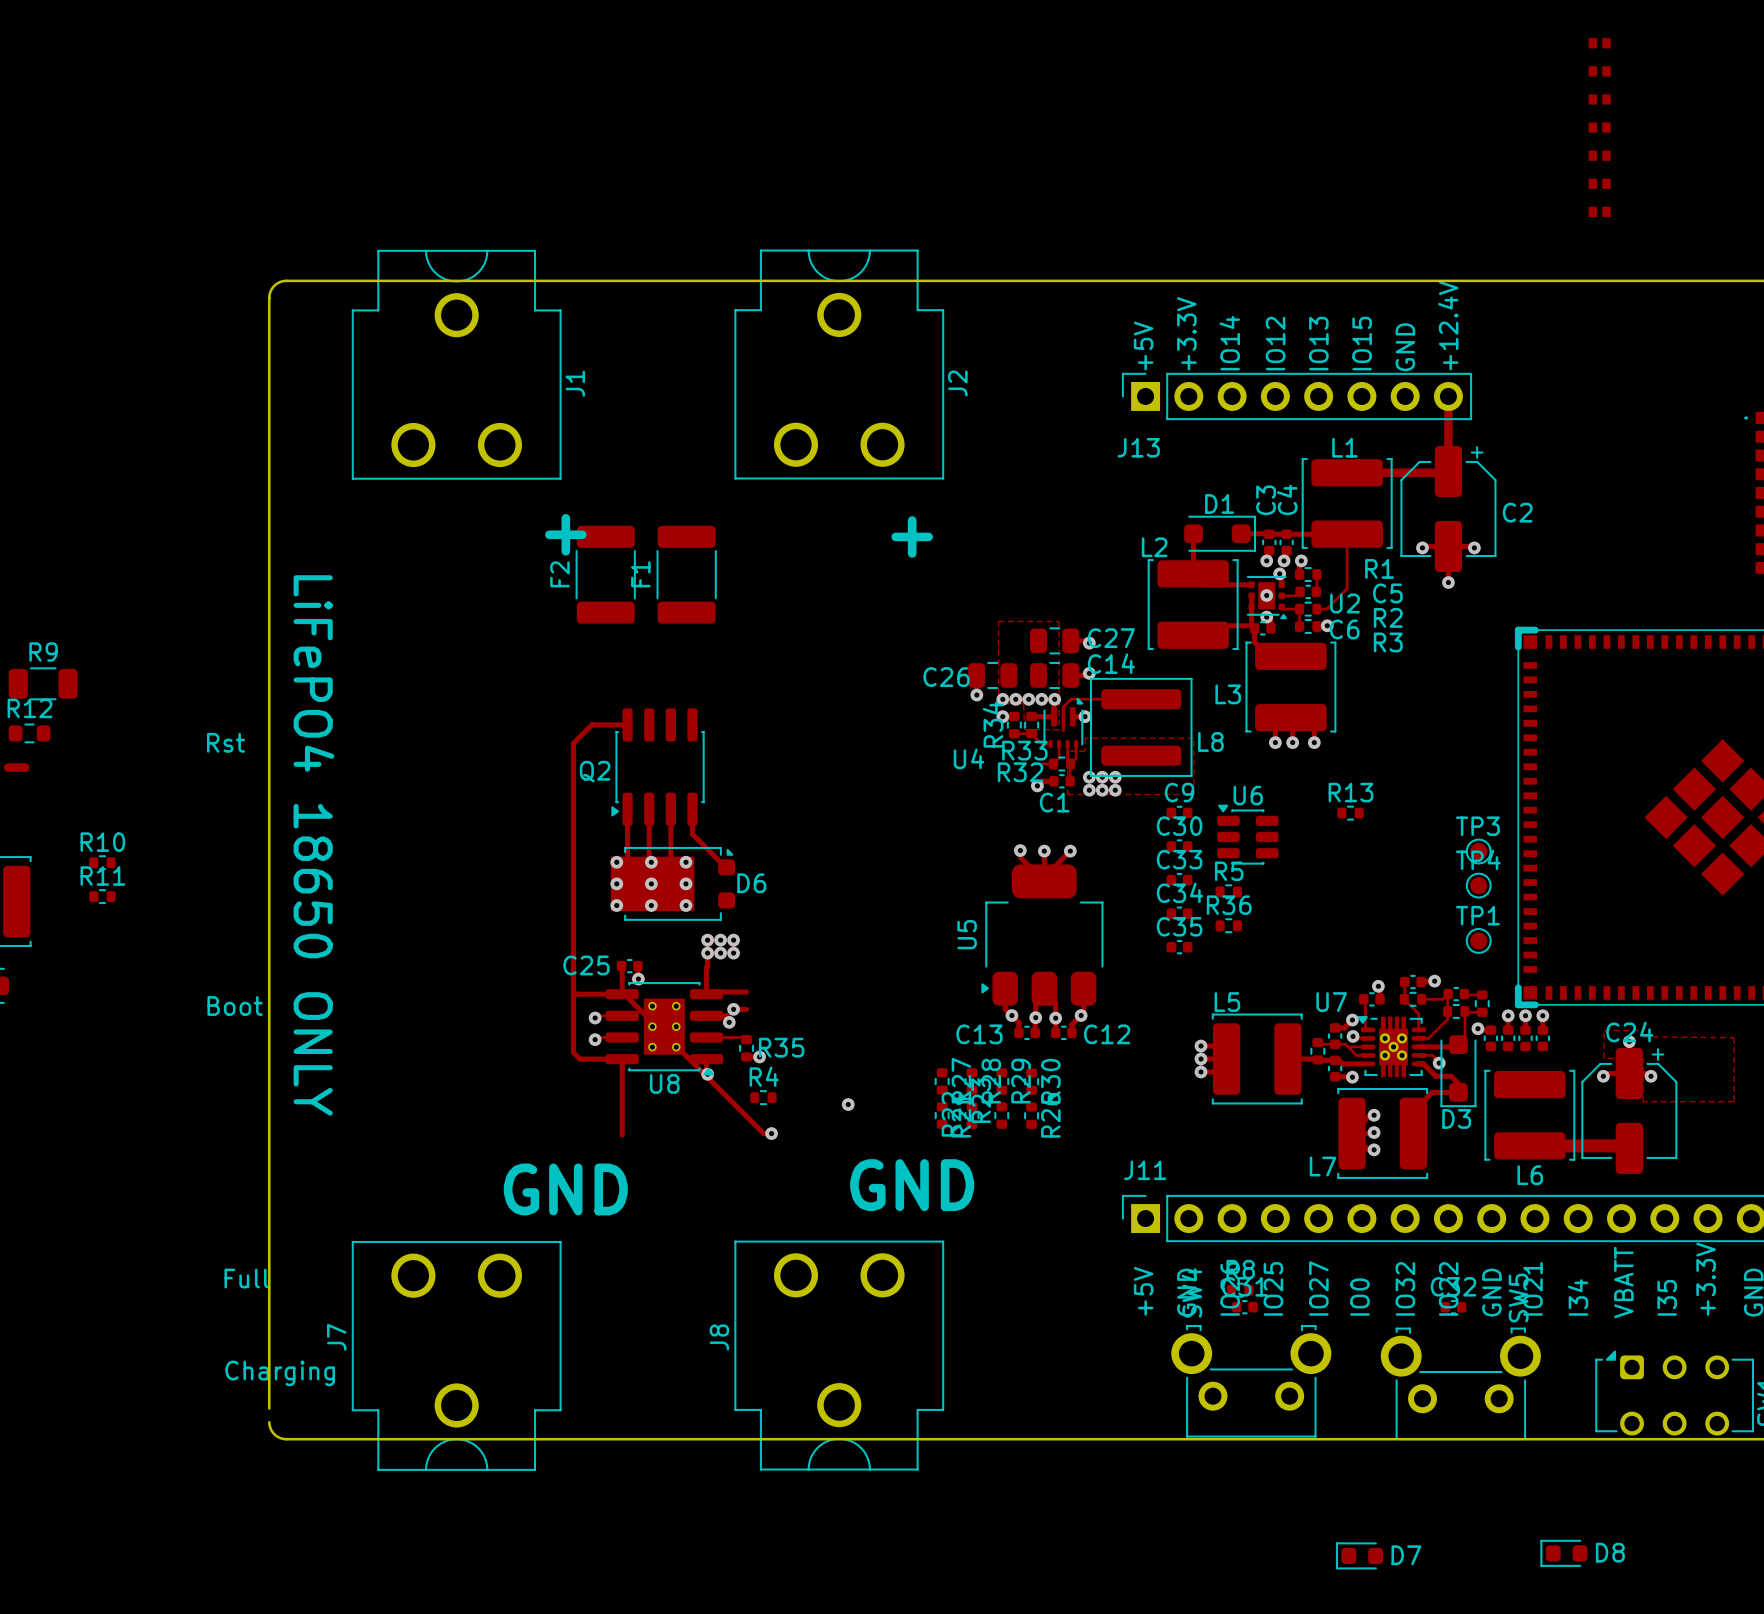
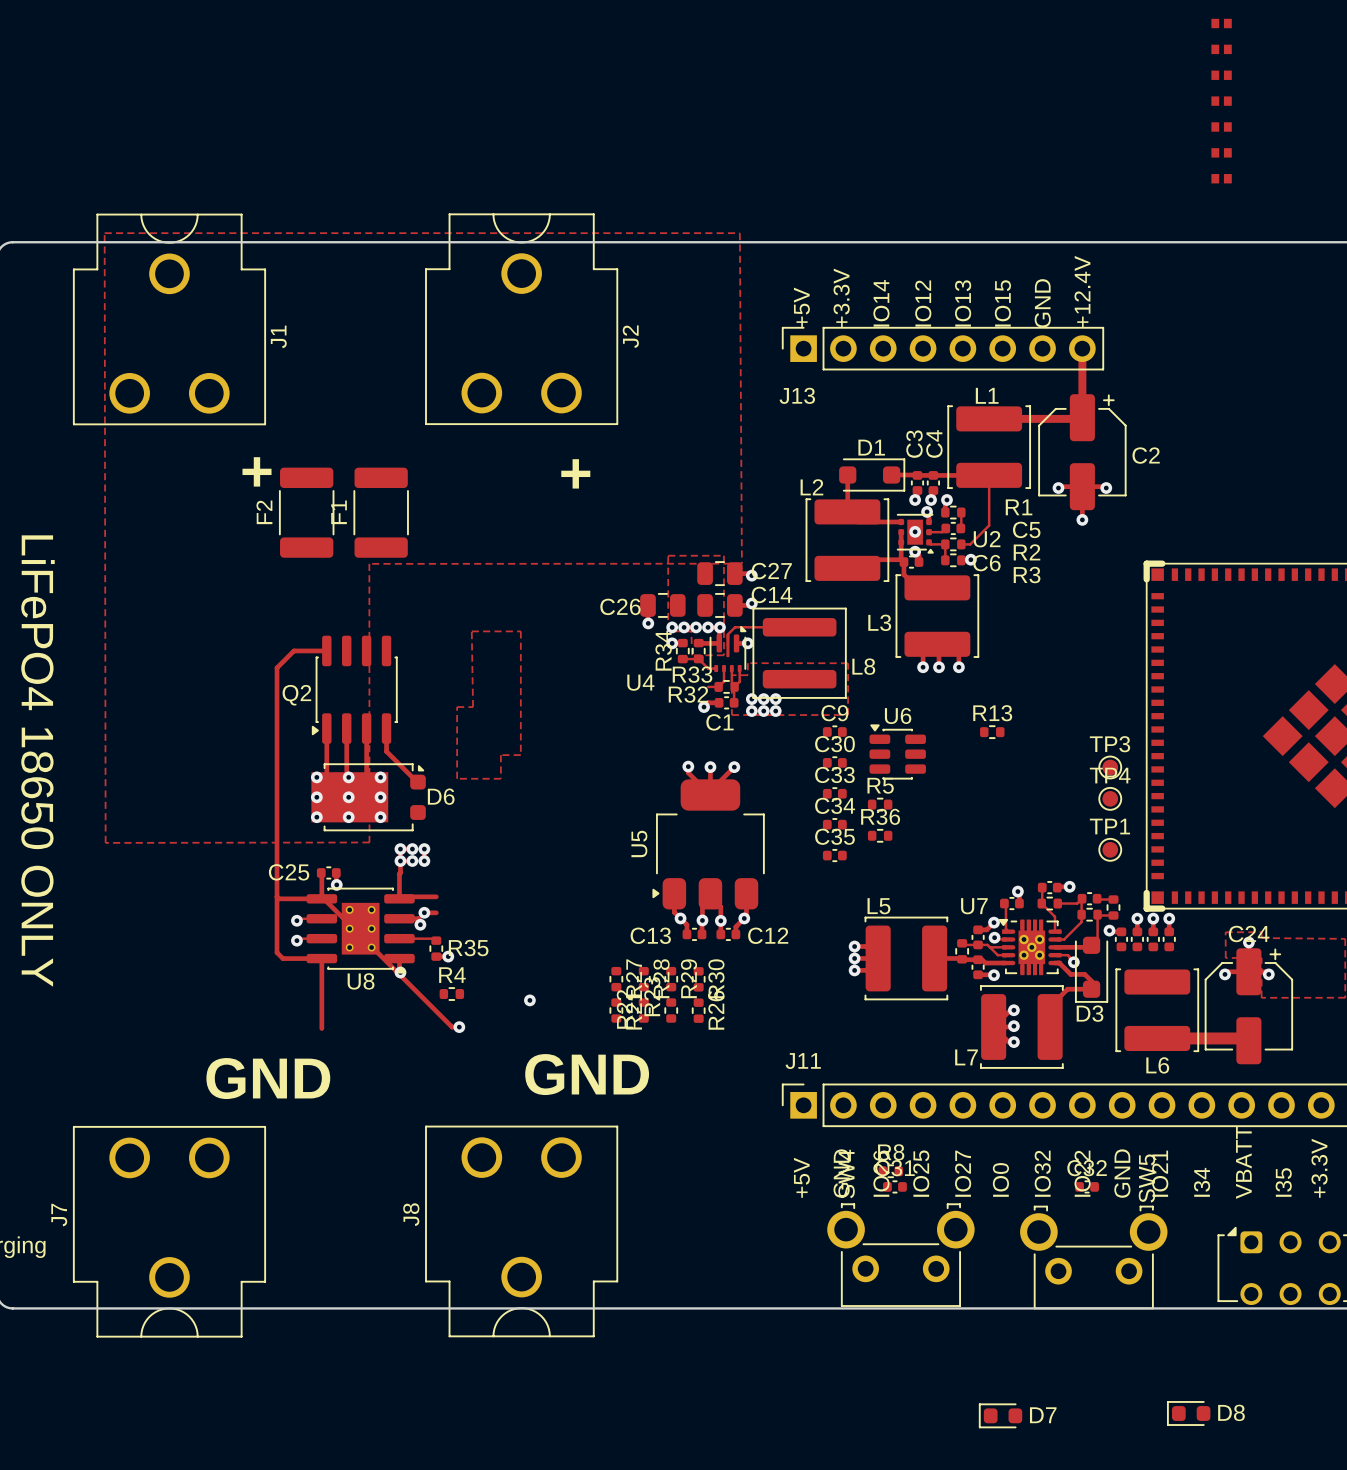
zone outline: none -> (104, 233) (739, 233) (741, 563) (369, 563) (369, 842) (105, 842) (104, 233)
zone outline: none -> (471, 631) (520, 631) (520, 755) (500, 755) (500, 778) (457, 778) (457, 707) (473, 707) (471, 631)

